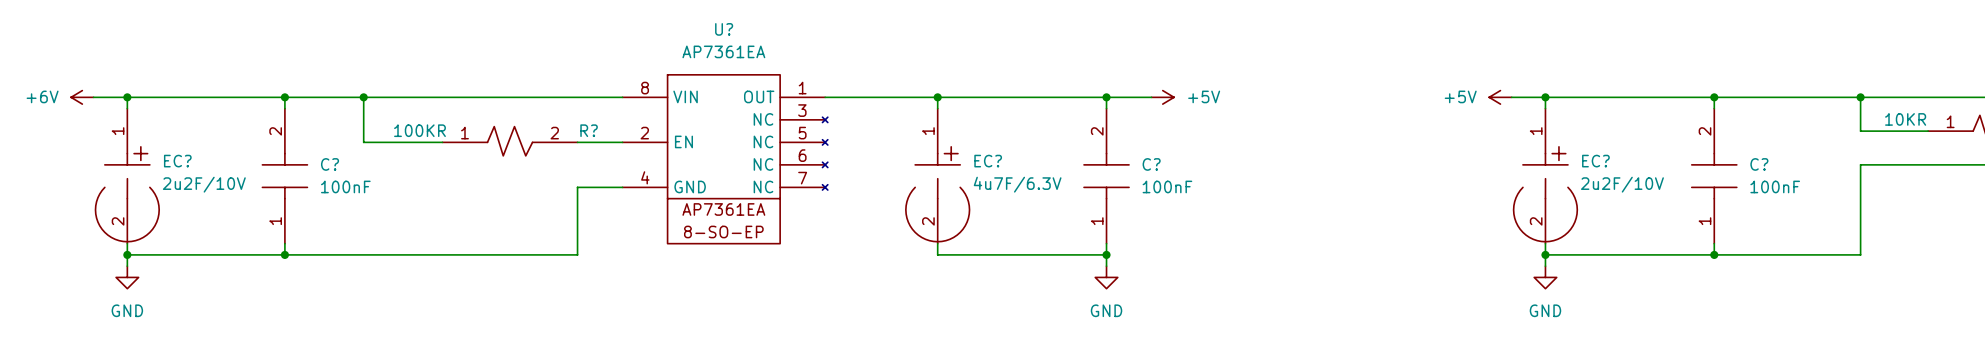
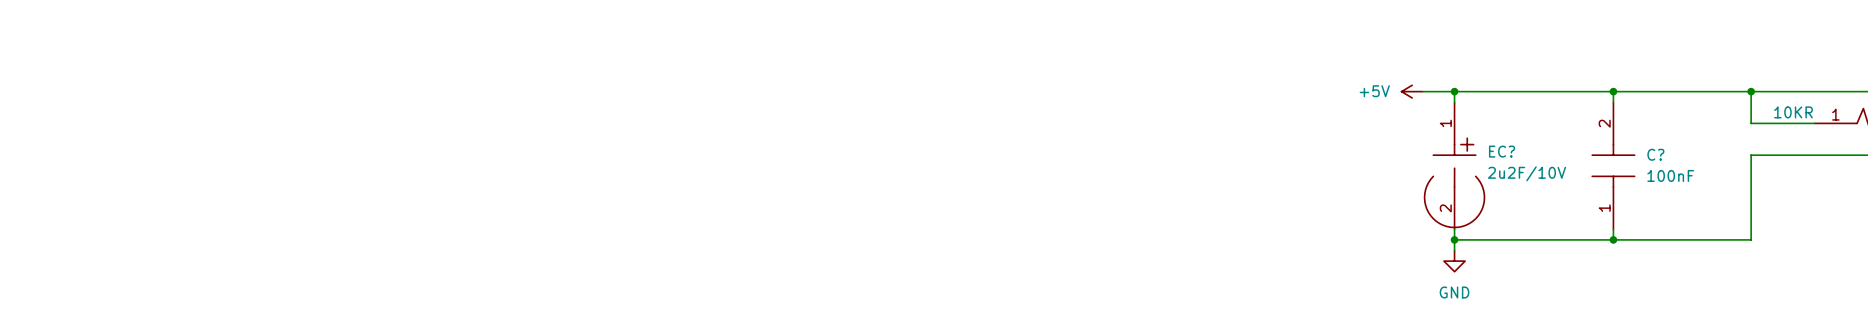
power symbol: +6V (82, 97) -> none
wire: (93, 97) (622, 97) -> none
wire: (127, 97) (127, 108) -> none
junction: (127, 97) -> none
wire: (284, 97) (284, 108) -> none
junction: (284, 97) -> none
wire: (363, 97) (363, 142) (442, 142) -> none
junction: (363, 97) -> none
wire: (825, 97) (1151, 97) -> none
wire: (937, 97) (937, 108) -> none
junction: (937, 97) -> none
wire: (1106, 97) (1106, 108) -> none
junction: (1106, 97) -> none
power symbol: +5V (1162, 97) -> none
R?: 100KR (510, 141) -> none
wire: (577, 142) (622, 142) -> none
U?: AP7361EA (725, 159) -> none
EC?: 2u2F/10V (127, 176) -> none
C?: 100nF (284, 176) -> none
EC?: 4u7F/6.3V (937, 176) -> none
C?: 100nF (1106, 176) -> none
wire: (622, 187) (577, 187) (577, 254) (127, 254) -> none
wire: (127, 243) (127, 266) -> none
wire: (284, 243) (284, 254) -> none
wire: (937, 243) (937, 254) (1106, 254) -> none
wire: (1106, 243) (1106, 266) -> none
junction: (127, 254) -> none
junction: (284, 254) -> none
junction: (1106, 254) -> none
power symbol: GND (127, 277) -> none
power symbol: GND (1106, 277) -> none

